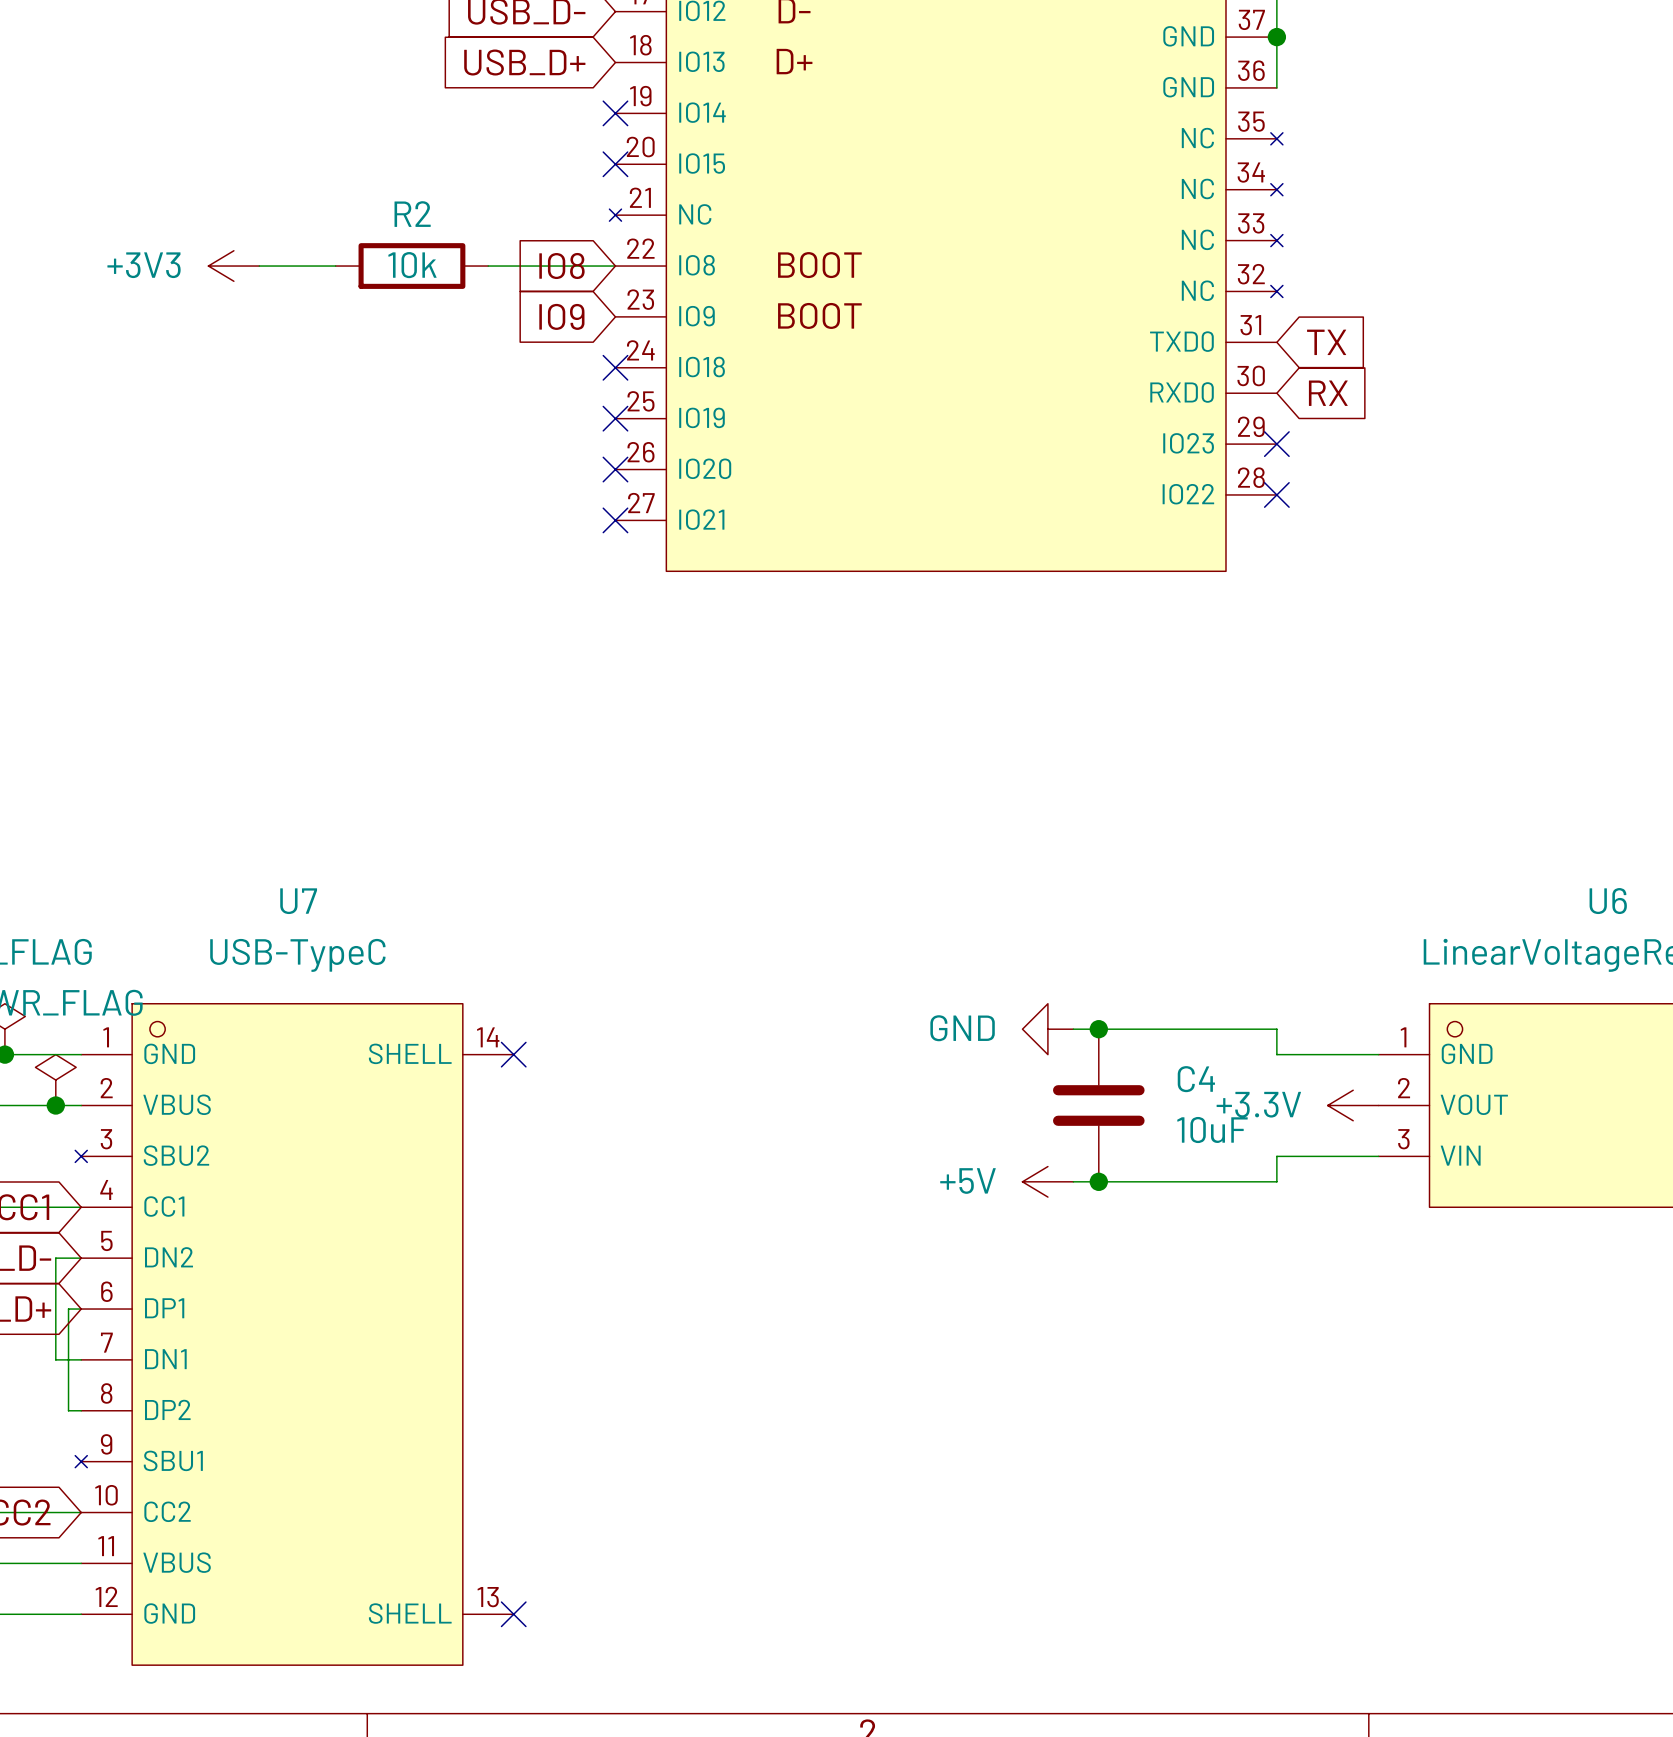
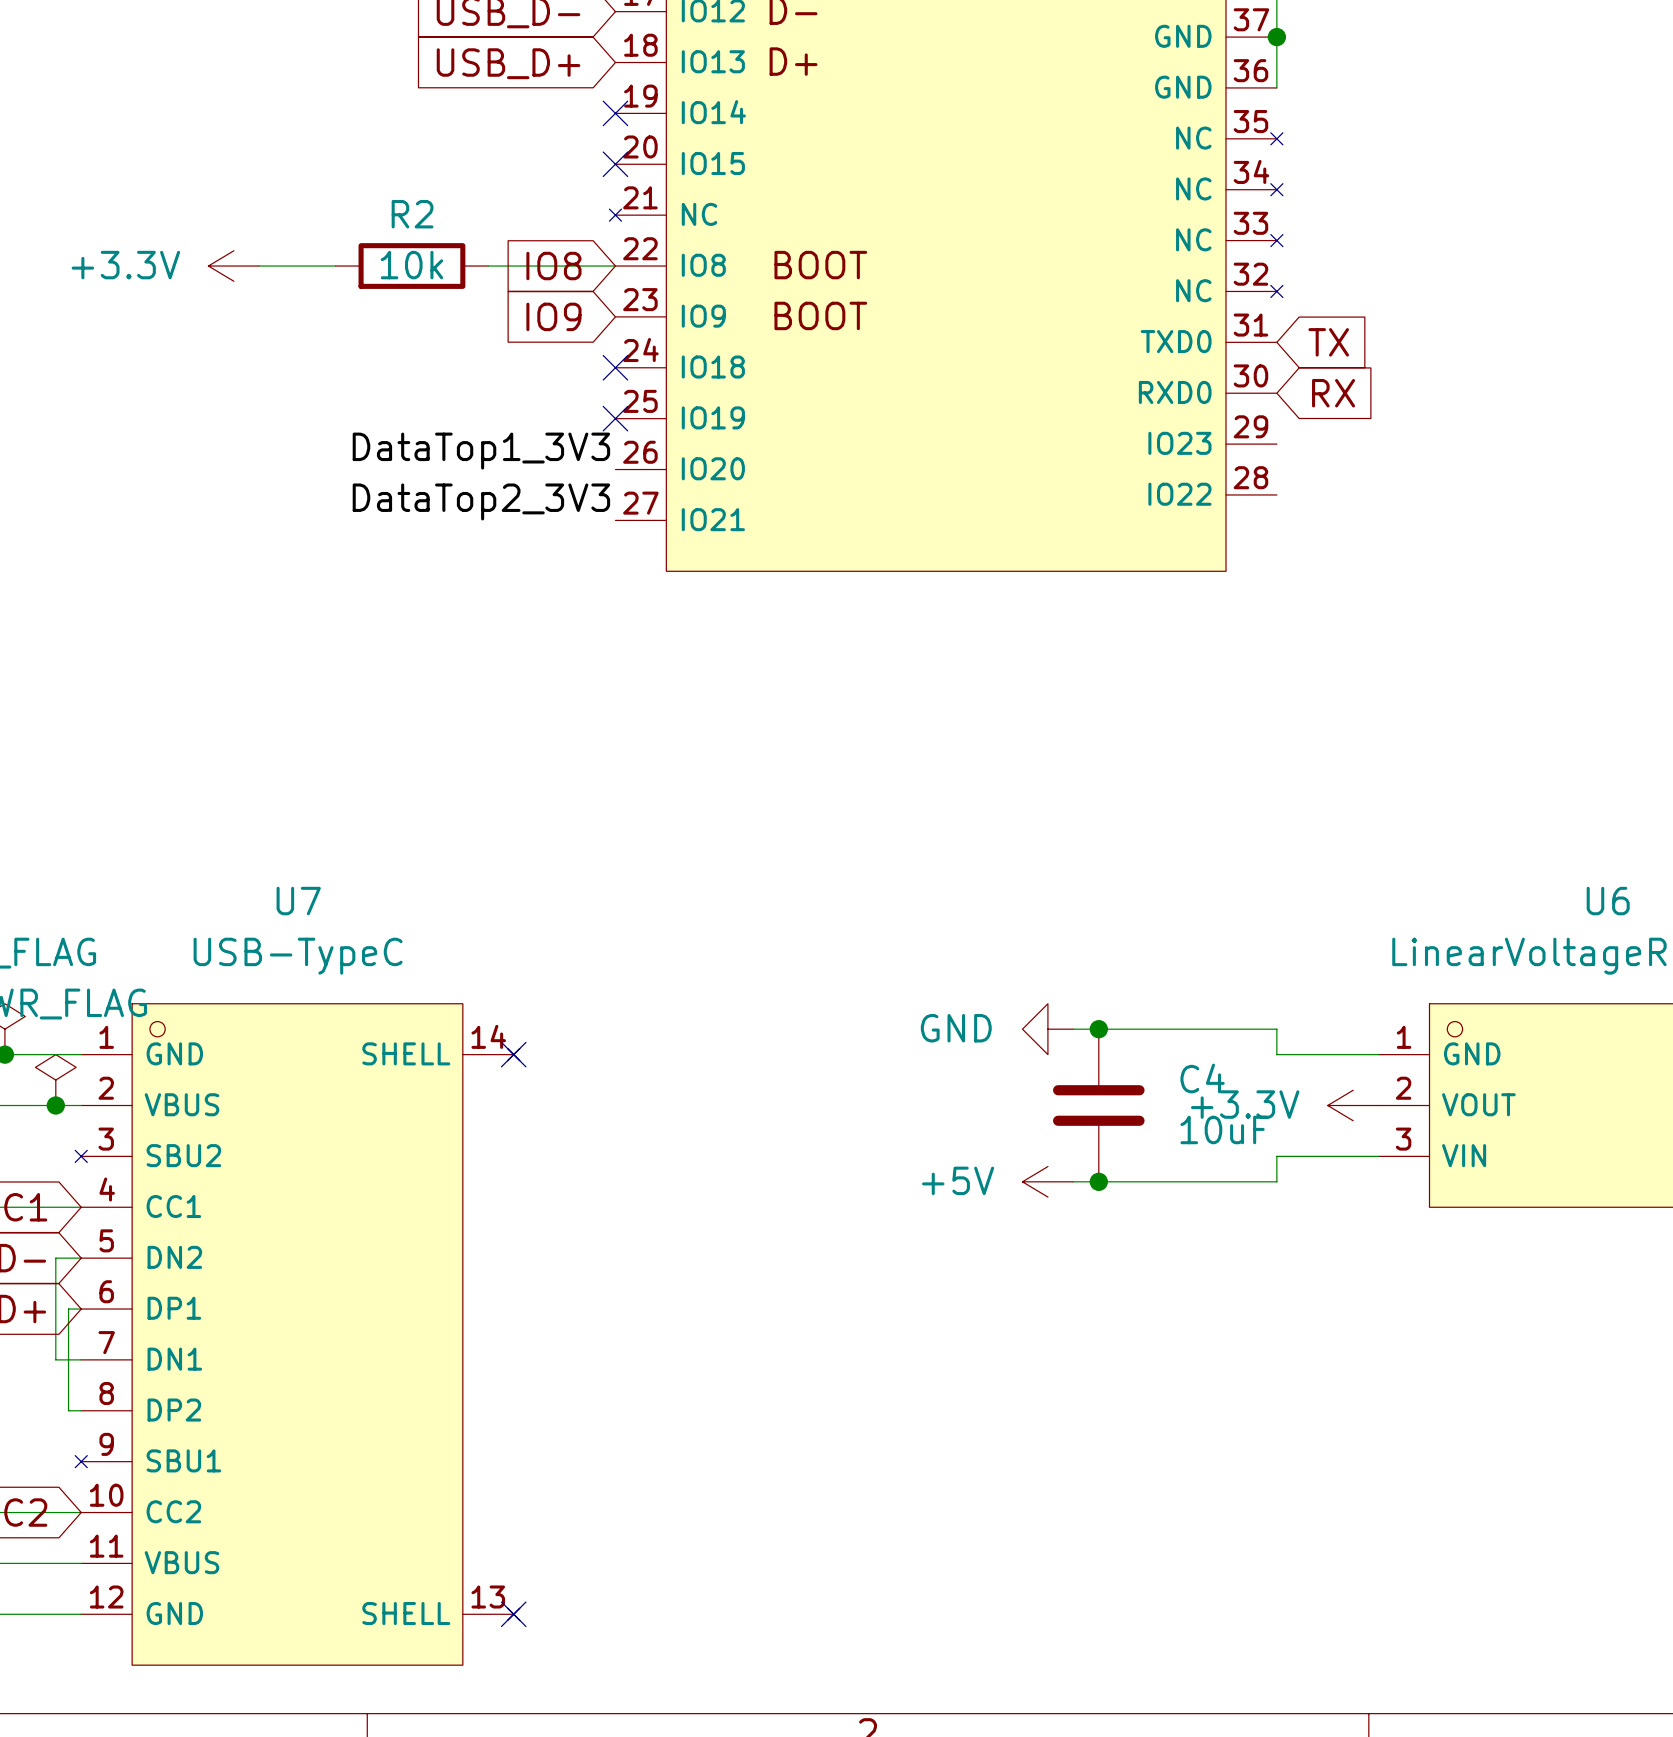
power symbol: +3V3 (233, 266) -> +3.3V (233, 266)
no-connect mark: (1276, 444) -> none
label: none -> DataTop1_3V3 (481, 451)
no-connect mark: (615, 469) -> none
no-connect mark: (1276, 494) -> none
label: none -> DataTop2_3V3 (481, 501)
no-connect mark: (615, 520) -> none
U7 symbol: [75, 1003, 514, 1666] -> [75, 1003, 520, 1666]

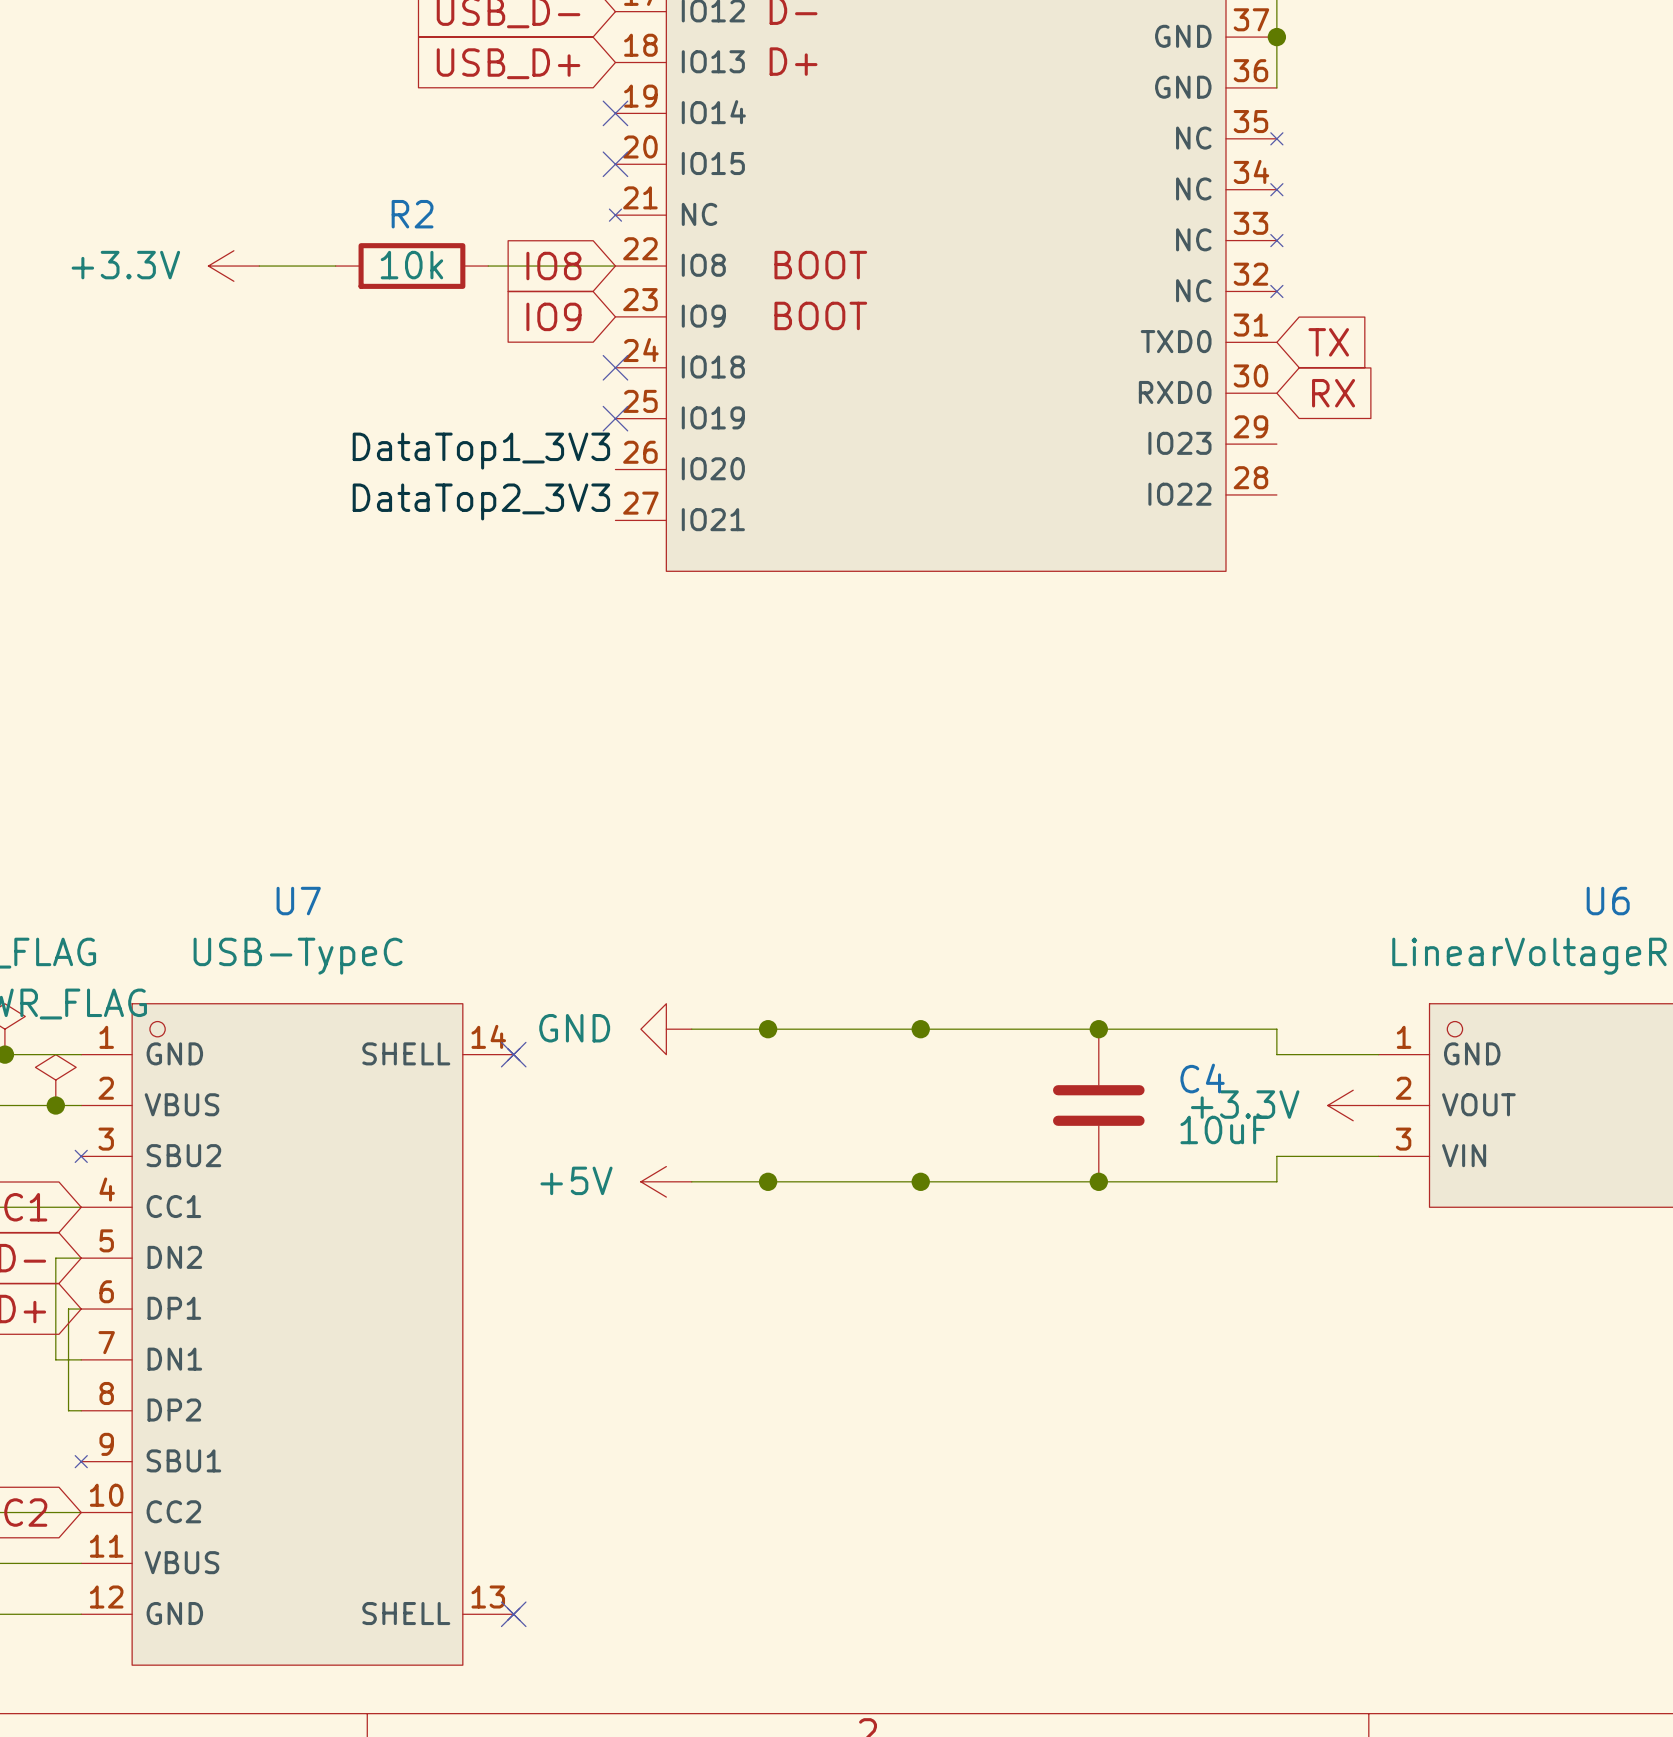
wire: none -> (691, 1029) (1073, 1029)
junction: none -> (768, 1029)
junction: none -> (920, 1029)
power symbol position: GND (1047, 1029) -> GND (666, 1029)
wire: none -> (691, 1181) (1073, 1181)
junction: none -> (768, 1181)
junction: none -> (920, 1181)
power symbol position: +5V (1047, 1181) -> +5V (666, 1181)

